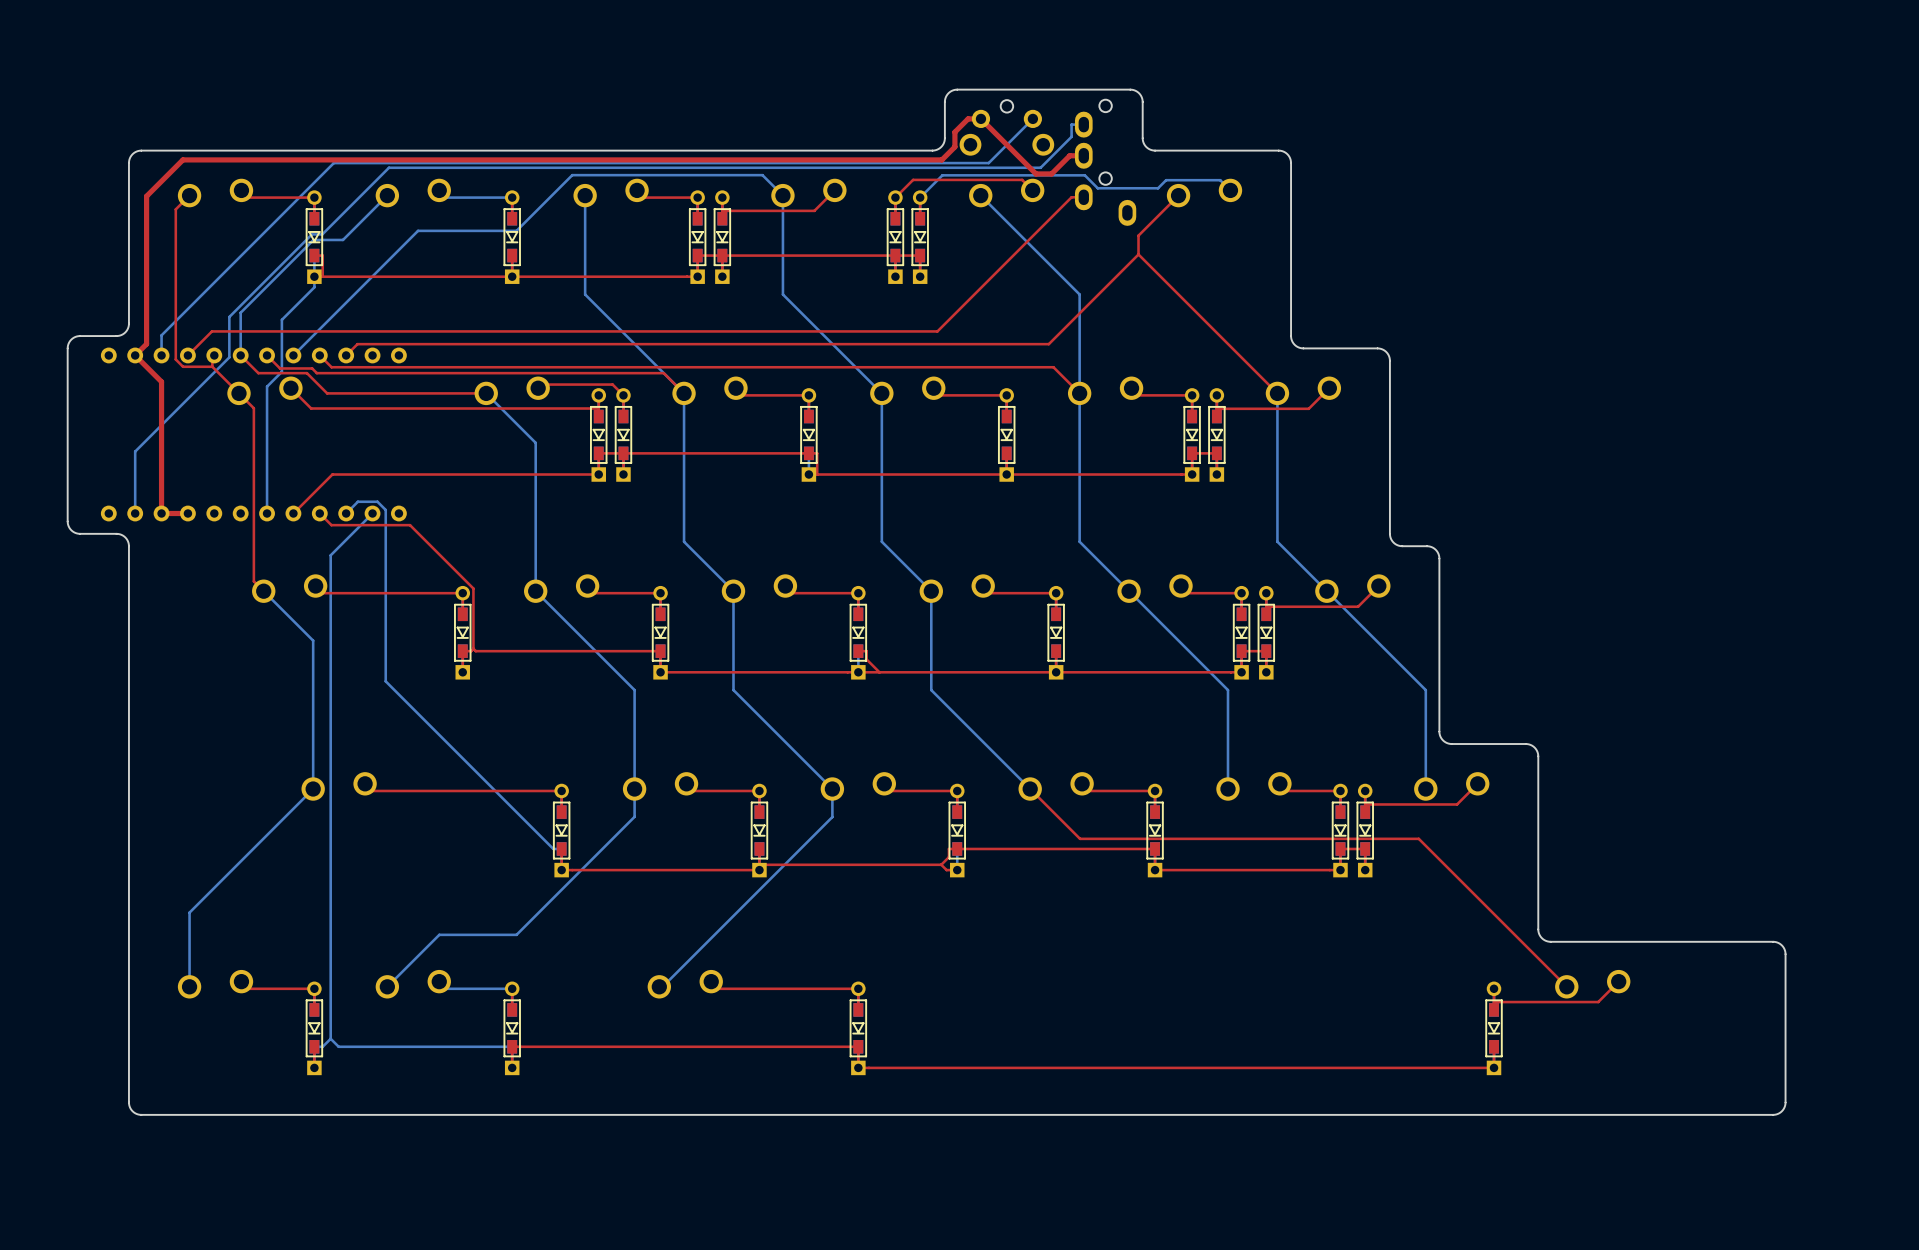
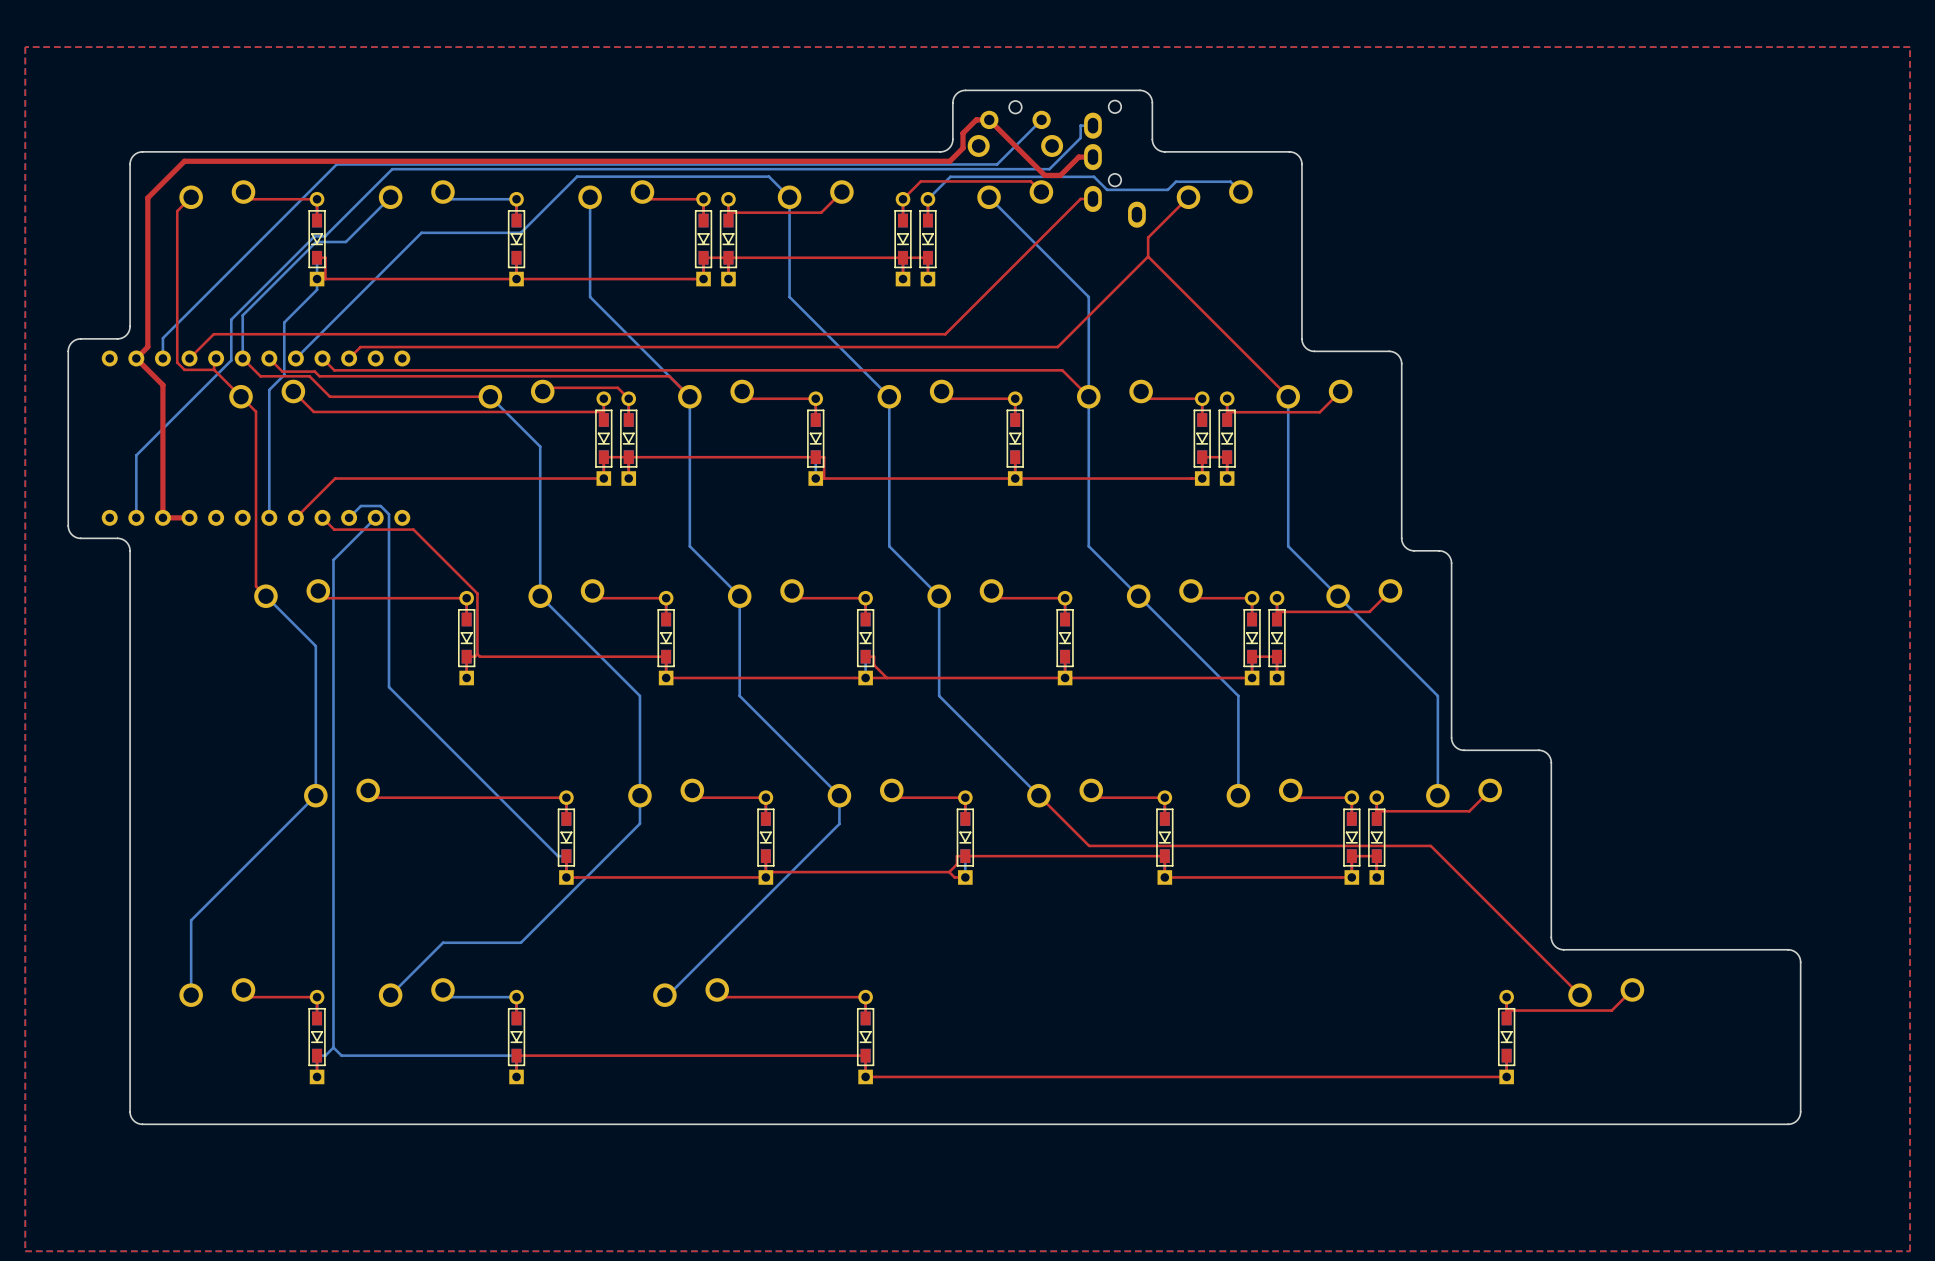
top zone outline: none -> (25, 47) (25, 1251) (1910, 1251) (1910, 47) (25, 47)

